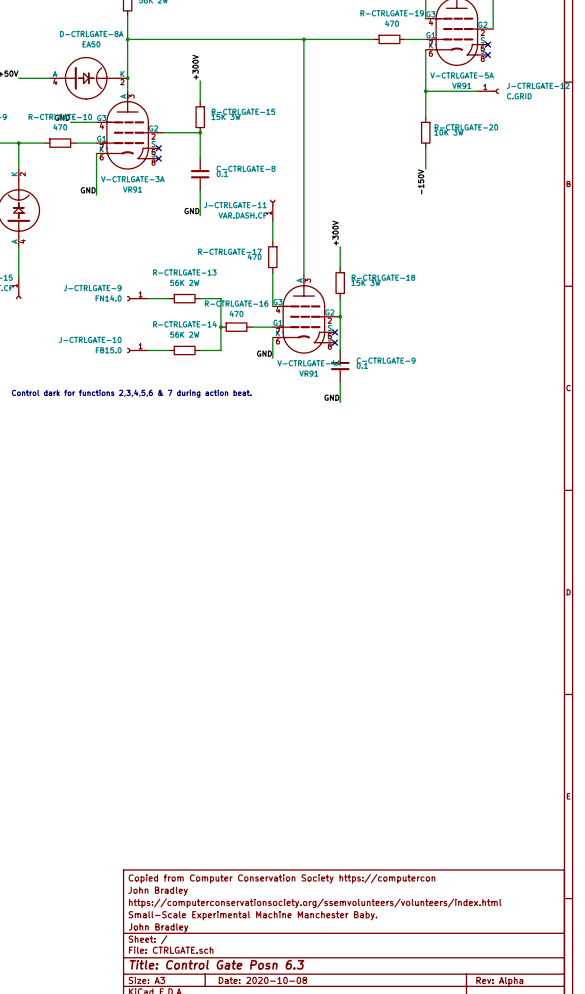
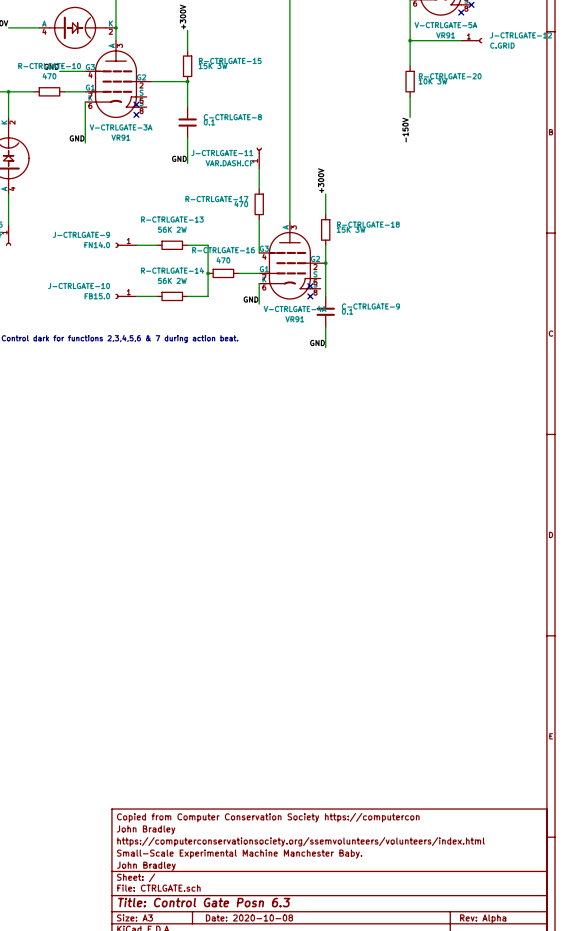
no-connect mark: none -> (461, 12)
no-connect mark: (158, 148) -> none
no-connect mark: none -> (136, 104)
no-connect mark: (158, 158) -> none
no-connect mark: none -> (136, 114)
no-connect mark: (335, 332) -> none
no-connect mark: none -> (310, 286)
no-connect mark: (335, 342) -> none
no-connect mark: none -> (310, 296)

